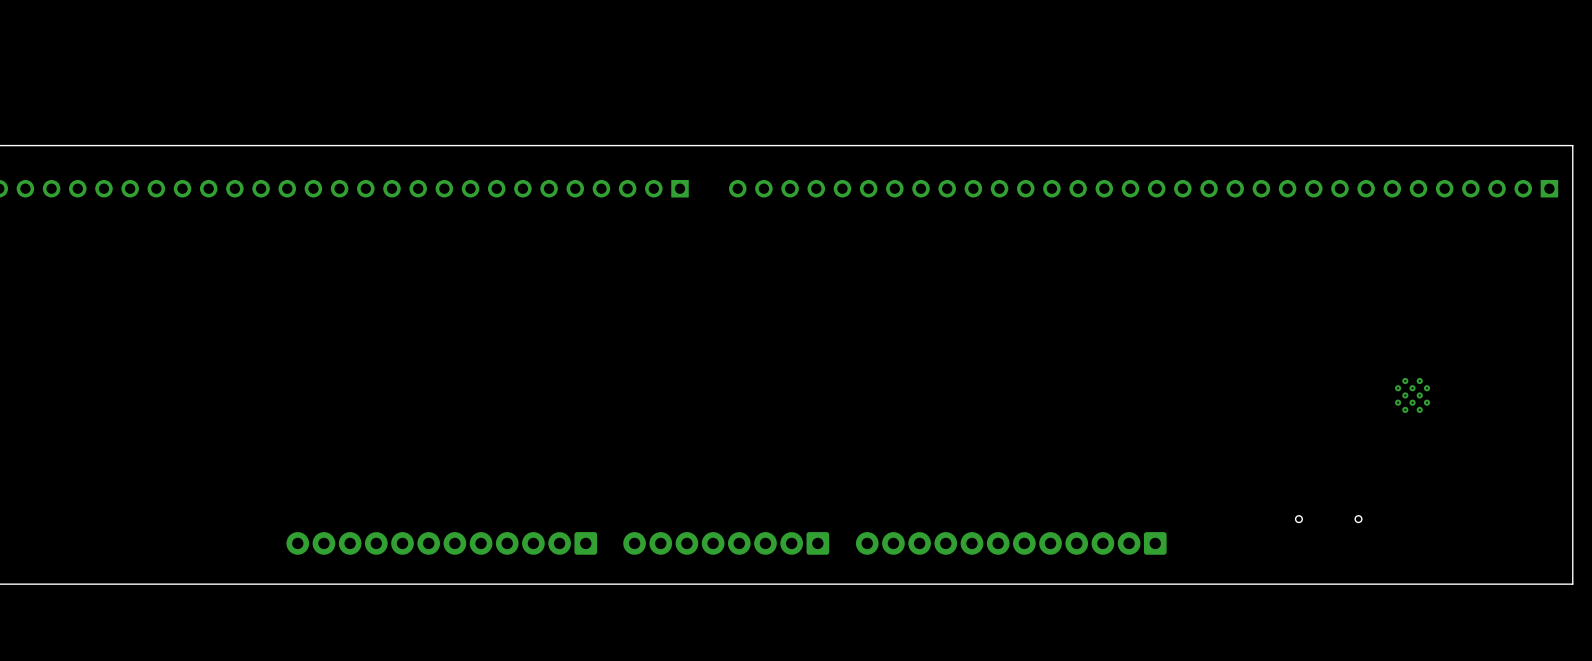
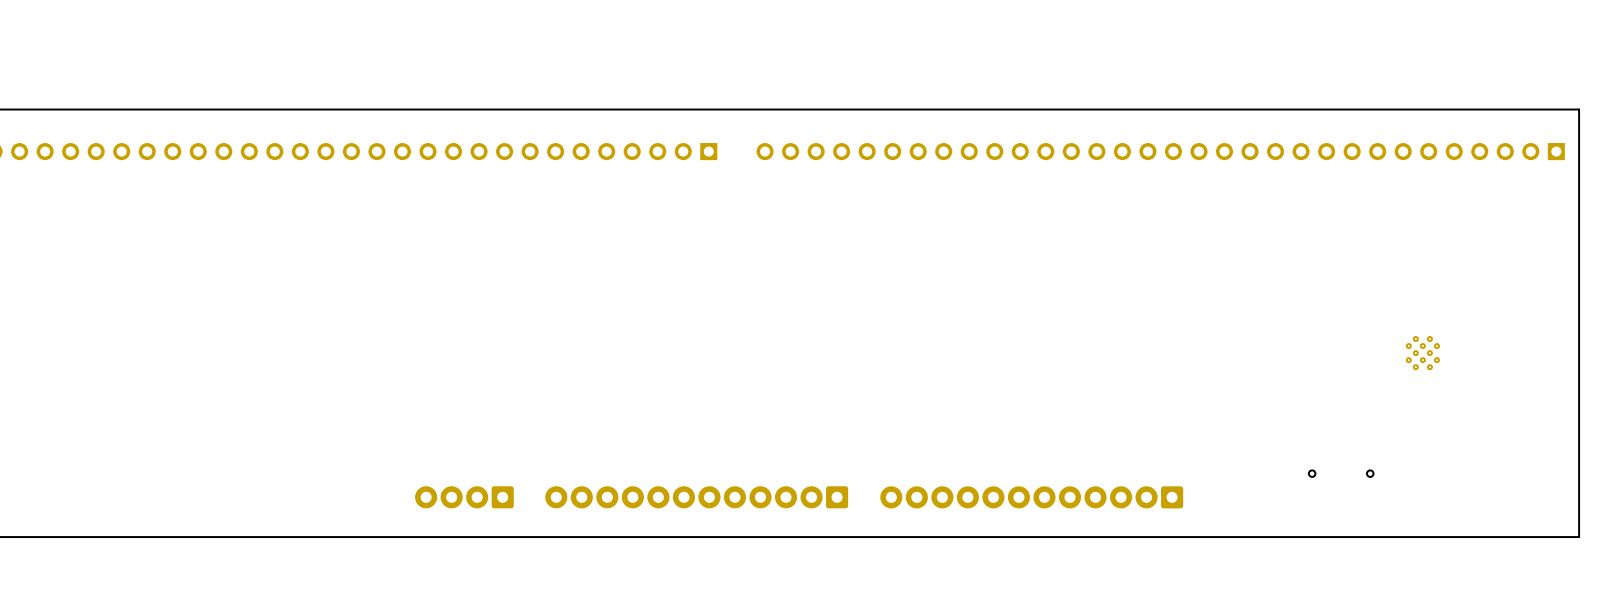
part: none -> (464, 497)
part position: (441, 543) -> (696, 497)
part: (726, 543) -> none

